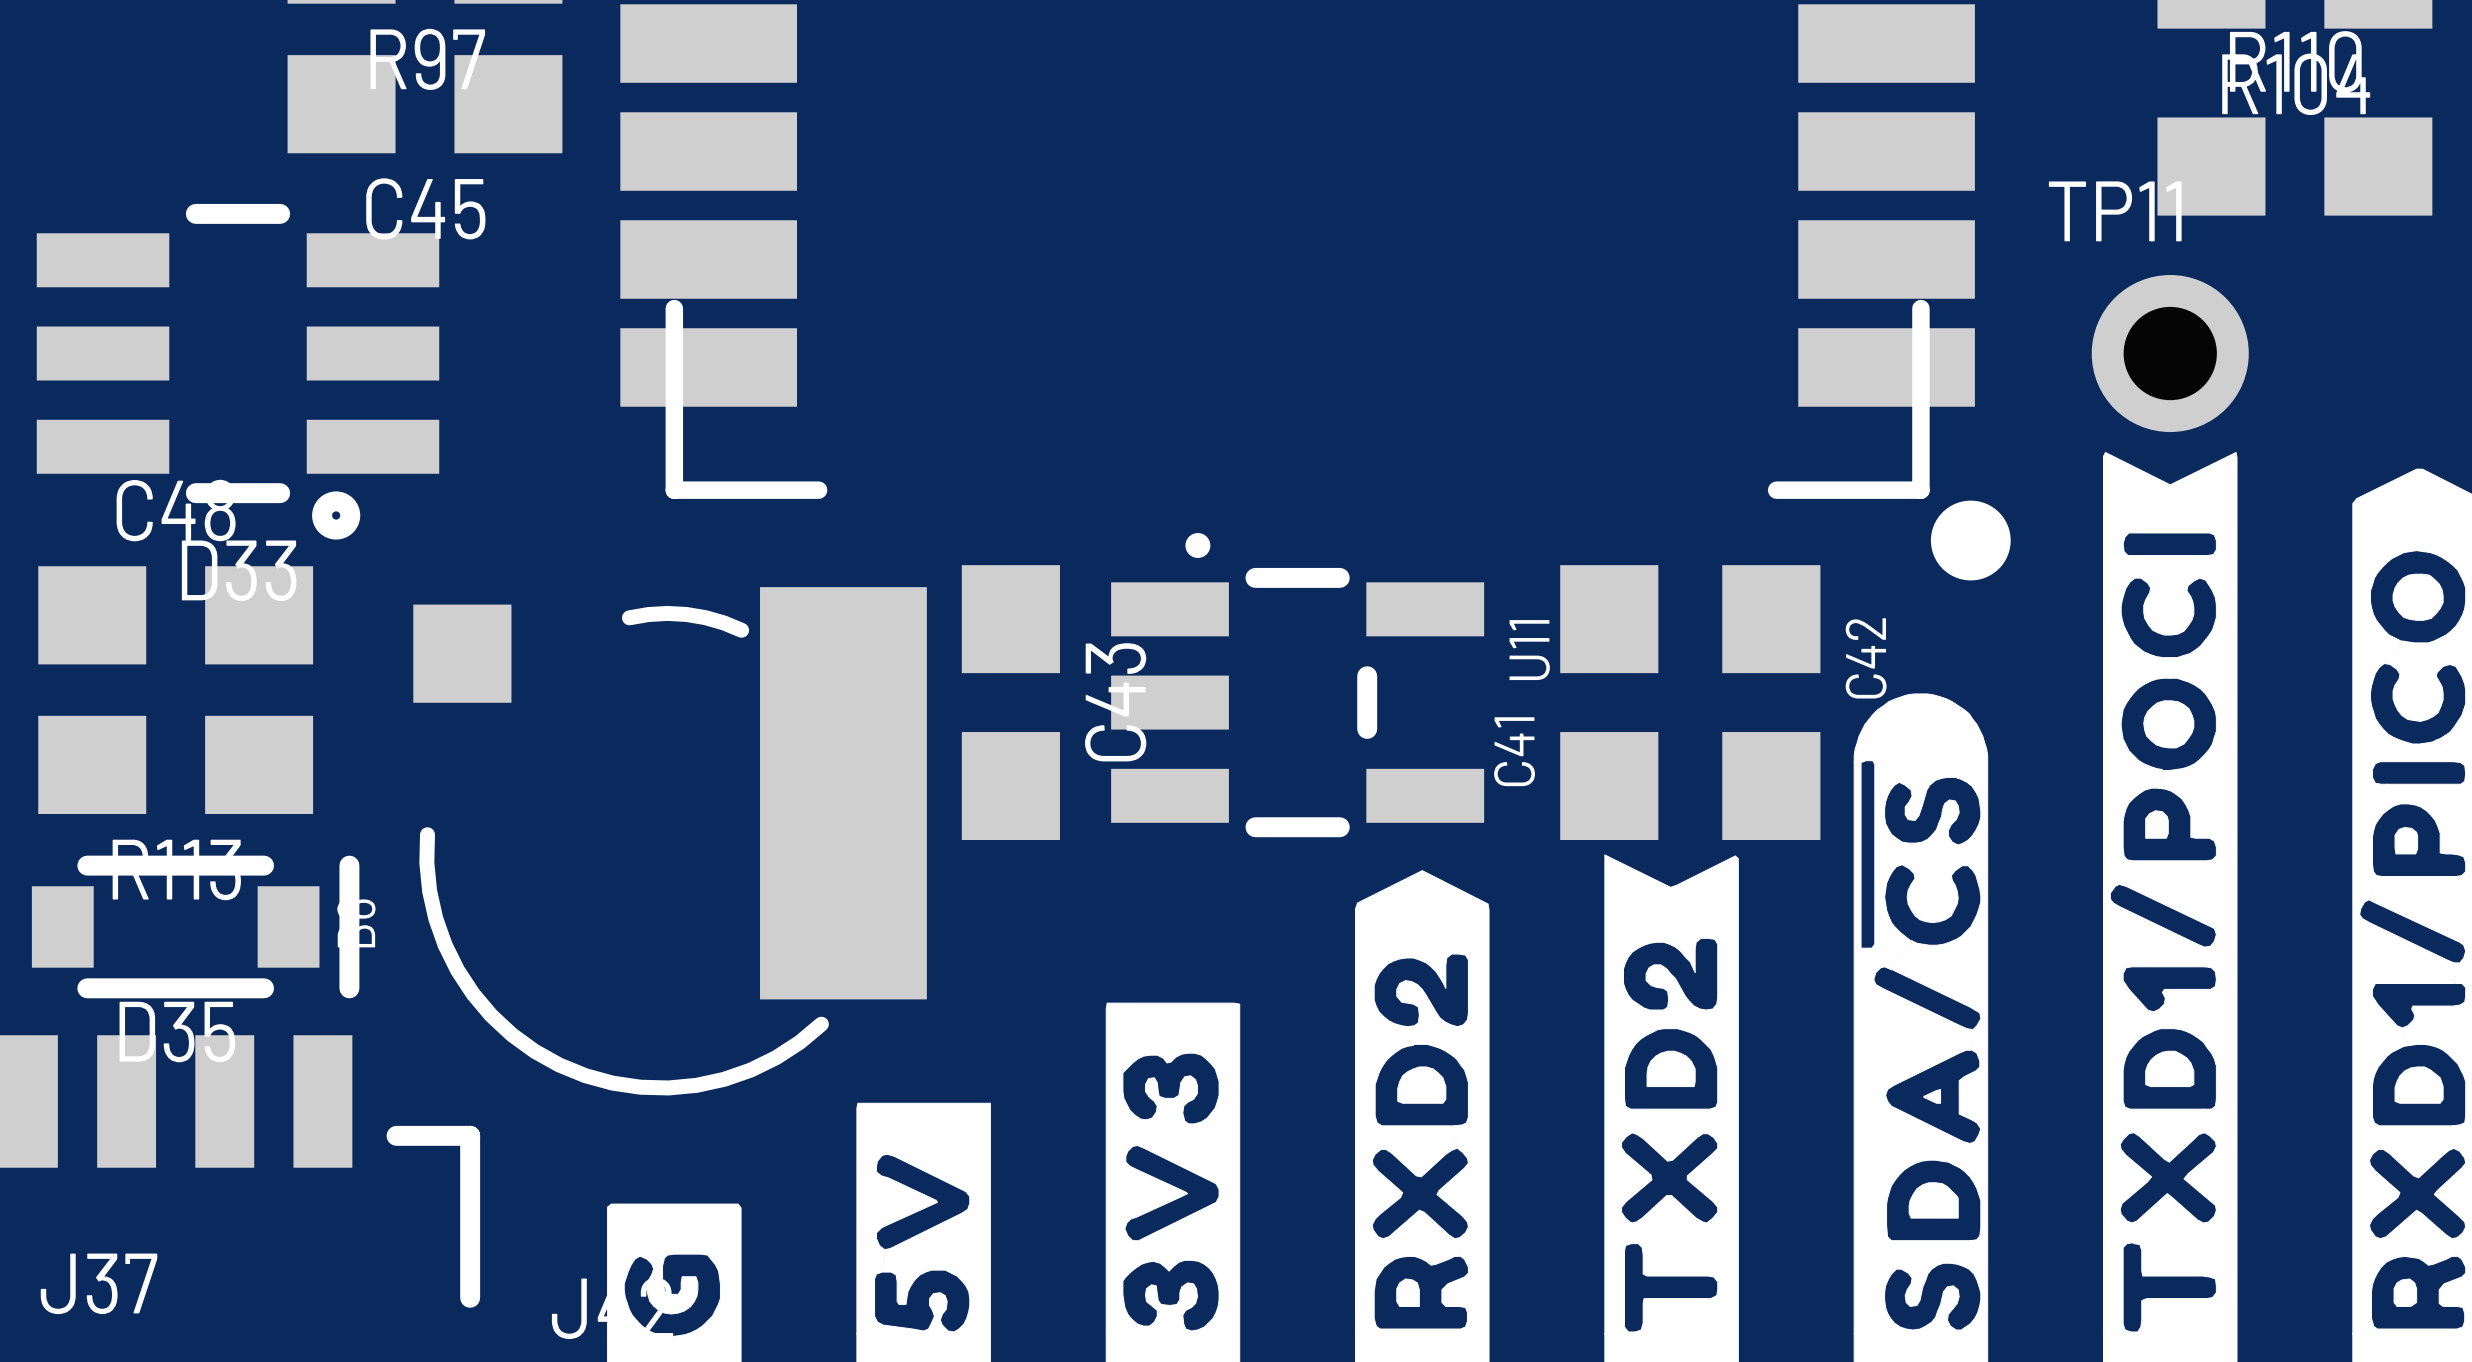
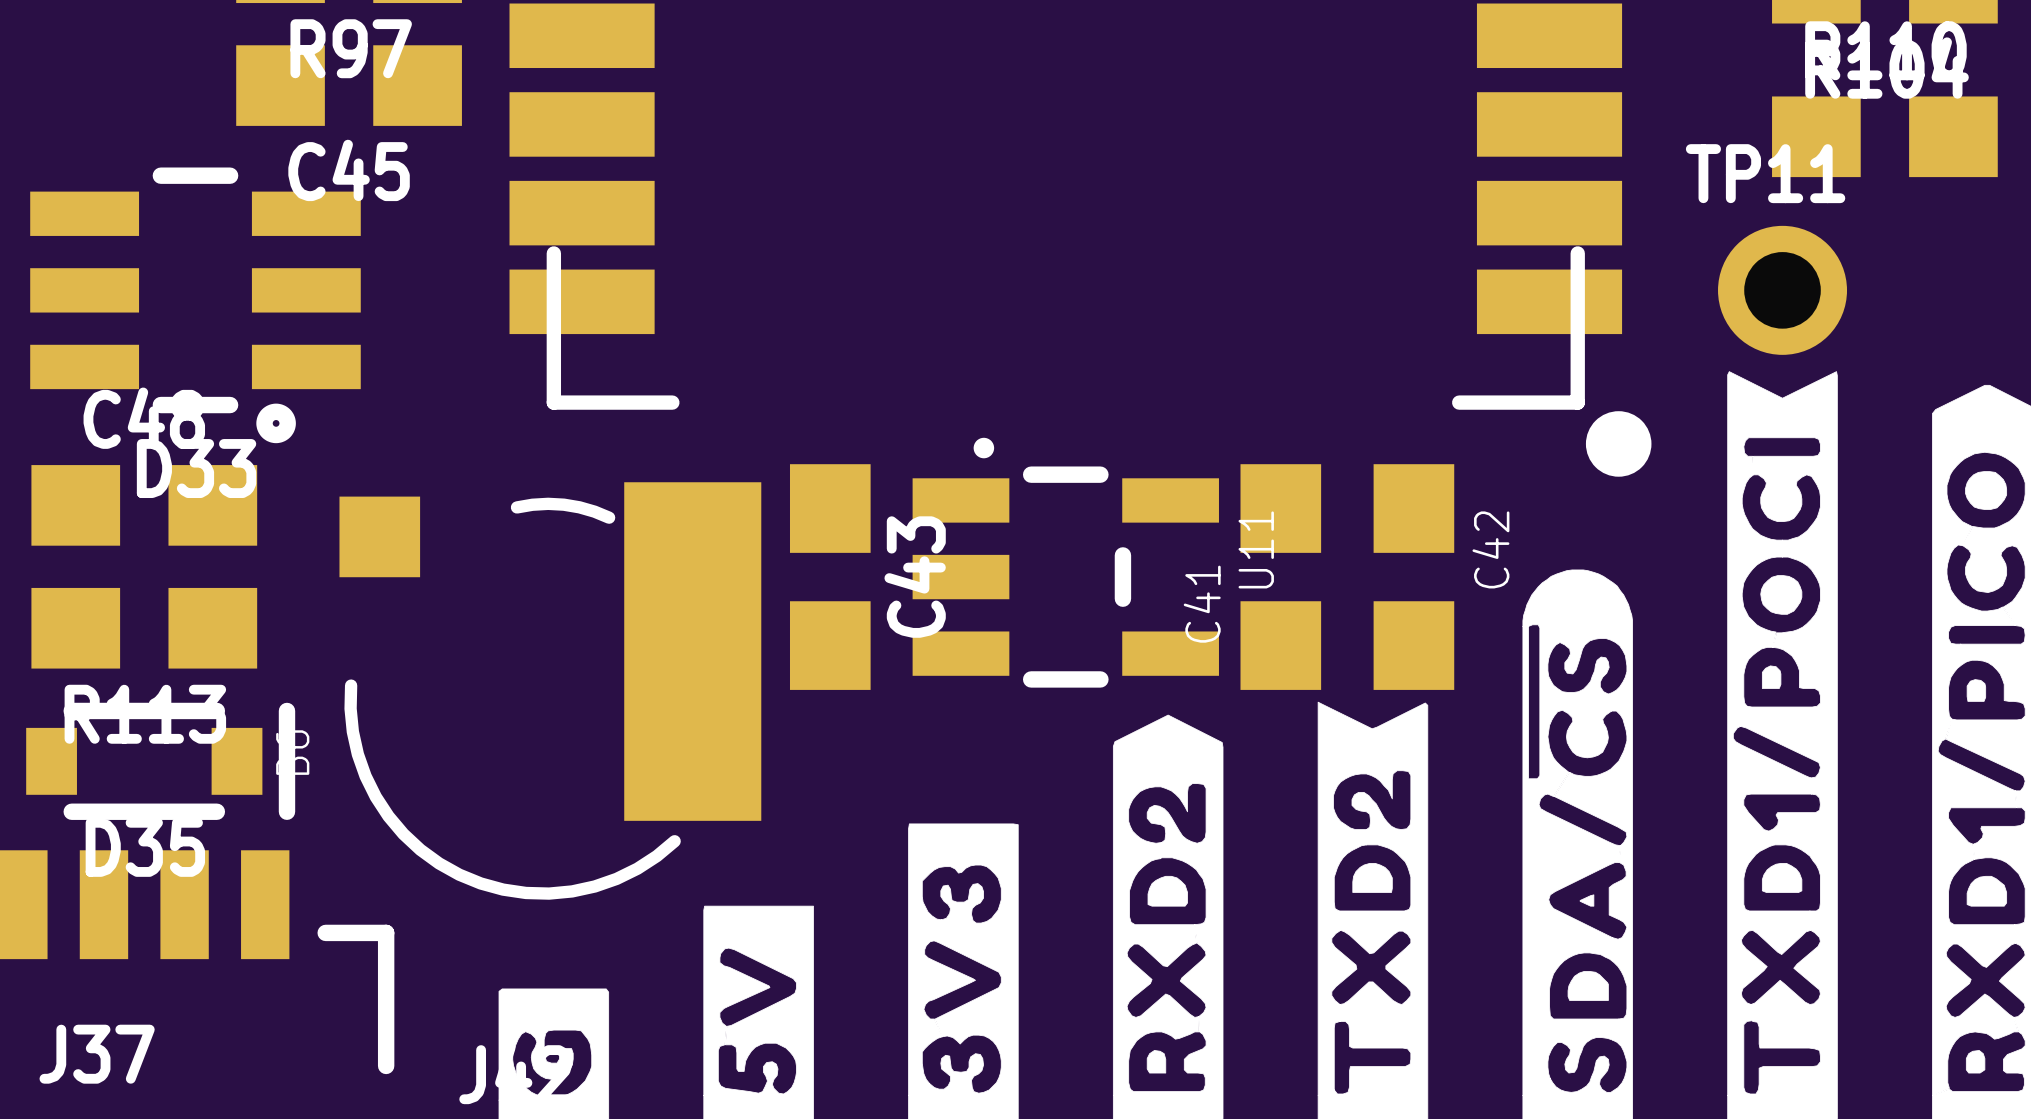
C41 position: (1609, 702) -> (1280, 577)
C42 position: (1771, 702) -> (1413, 577)

